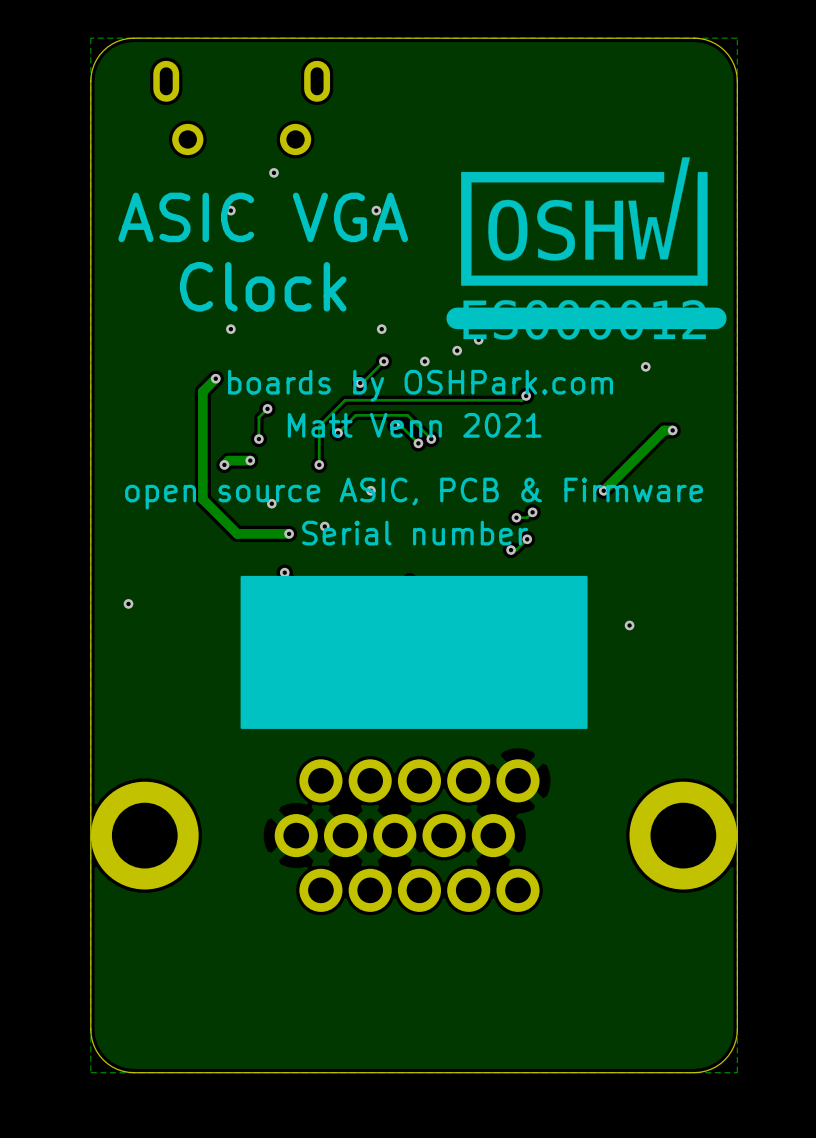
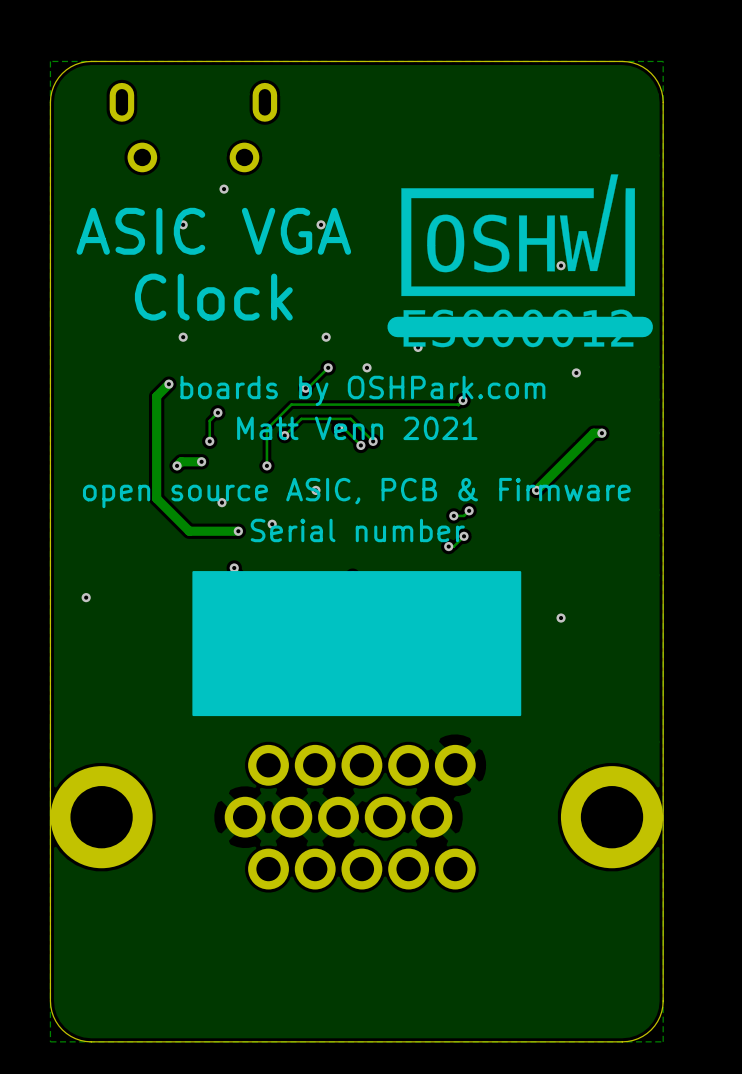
via: none -> (561, 265)
via: (457, 350) -> none

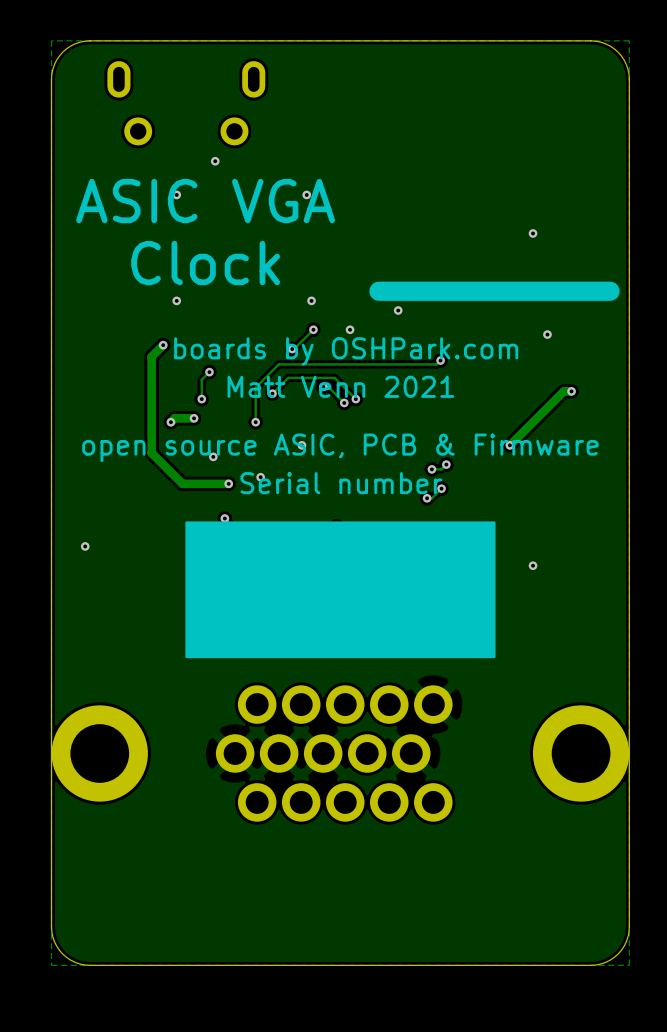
drawing: [401, 174, 635, 348] -> none

